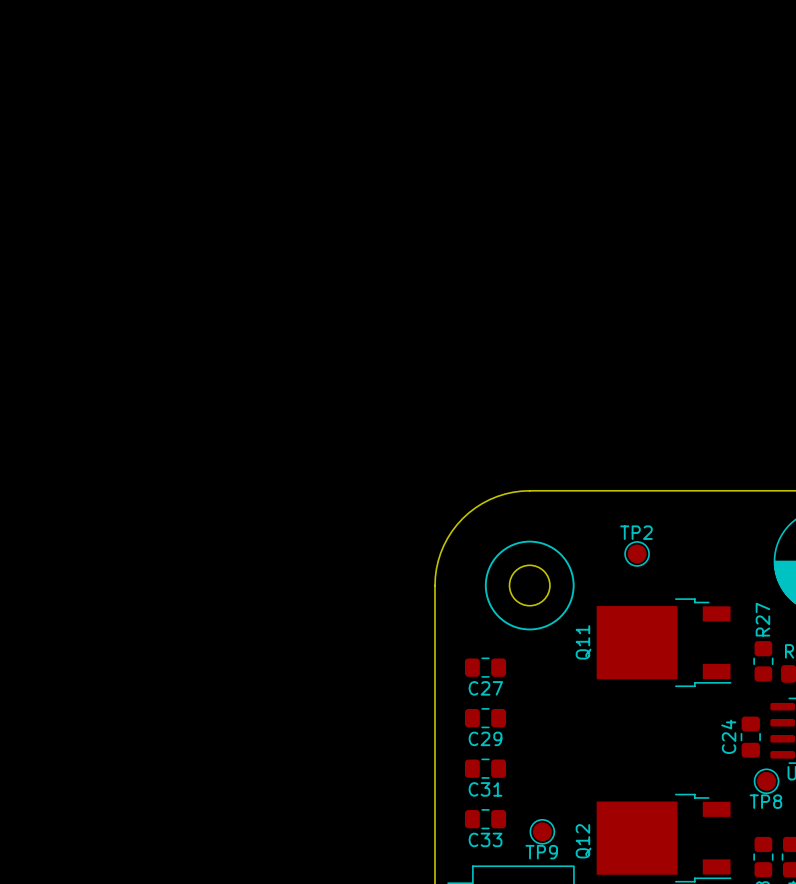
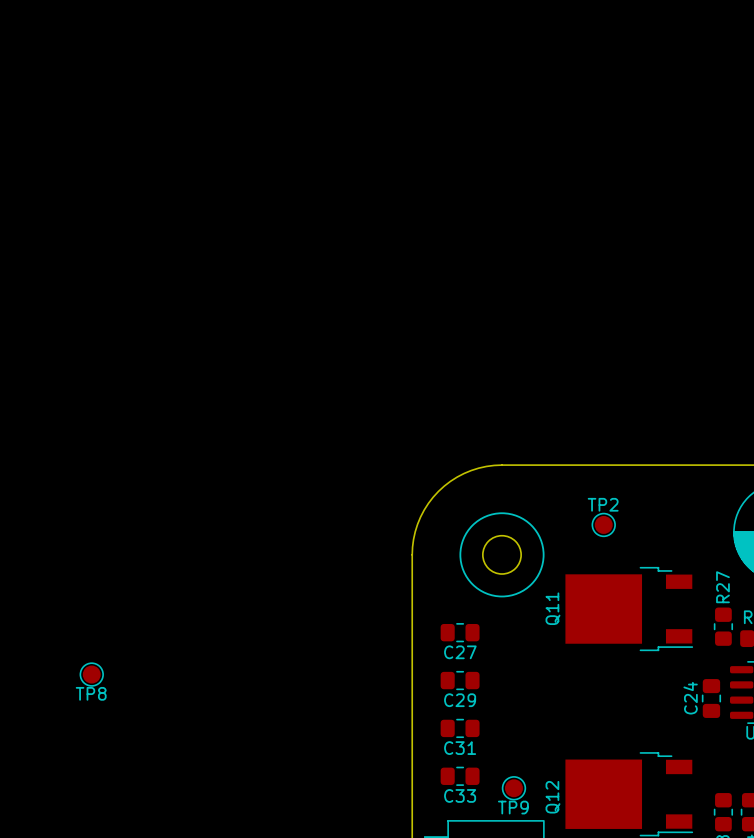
TP8 position: (766, 781) -> (91, 674)

